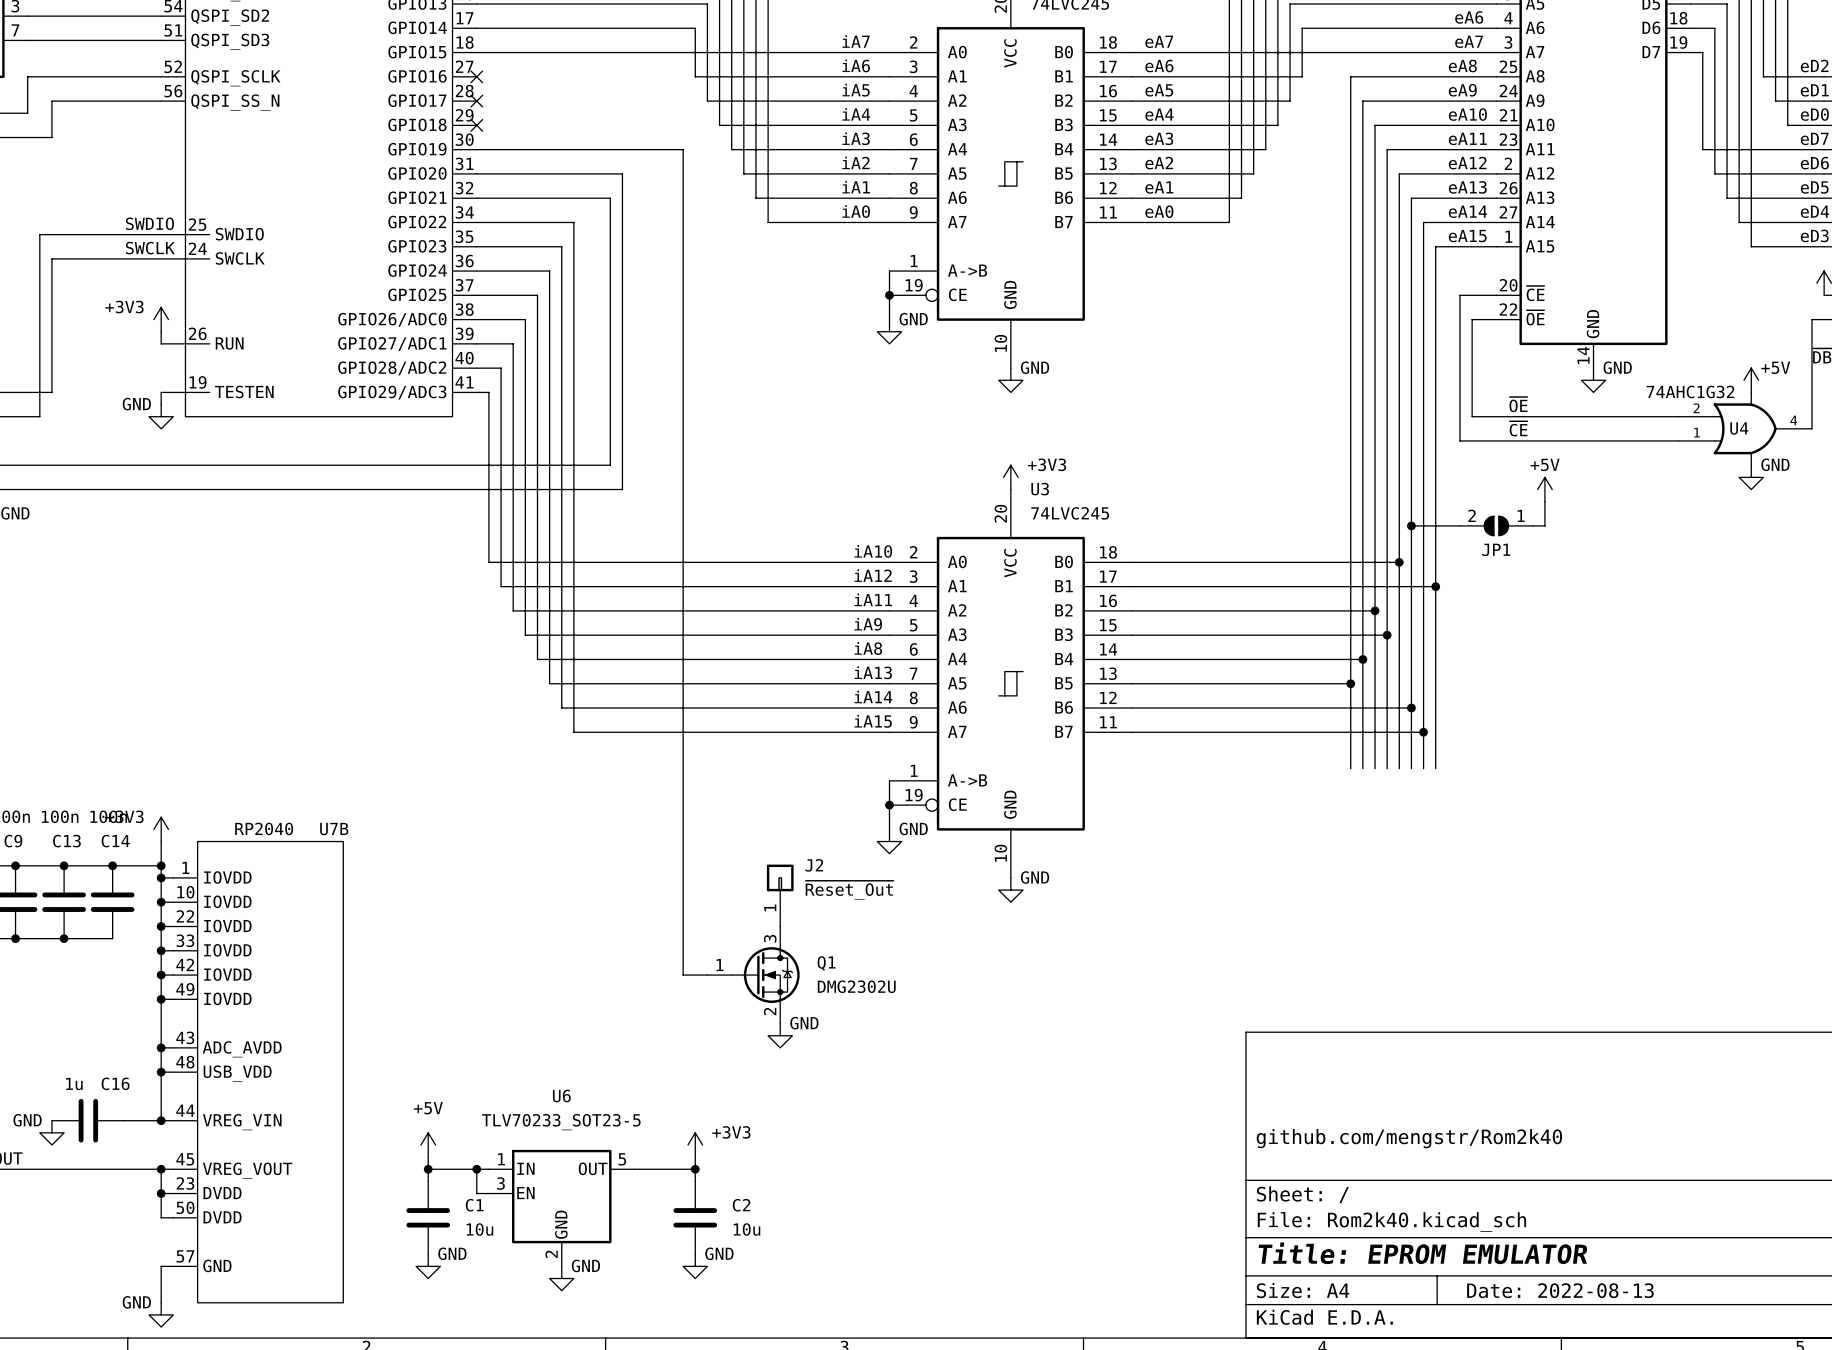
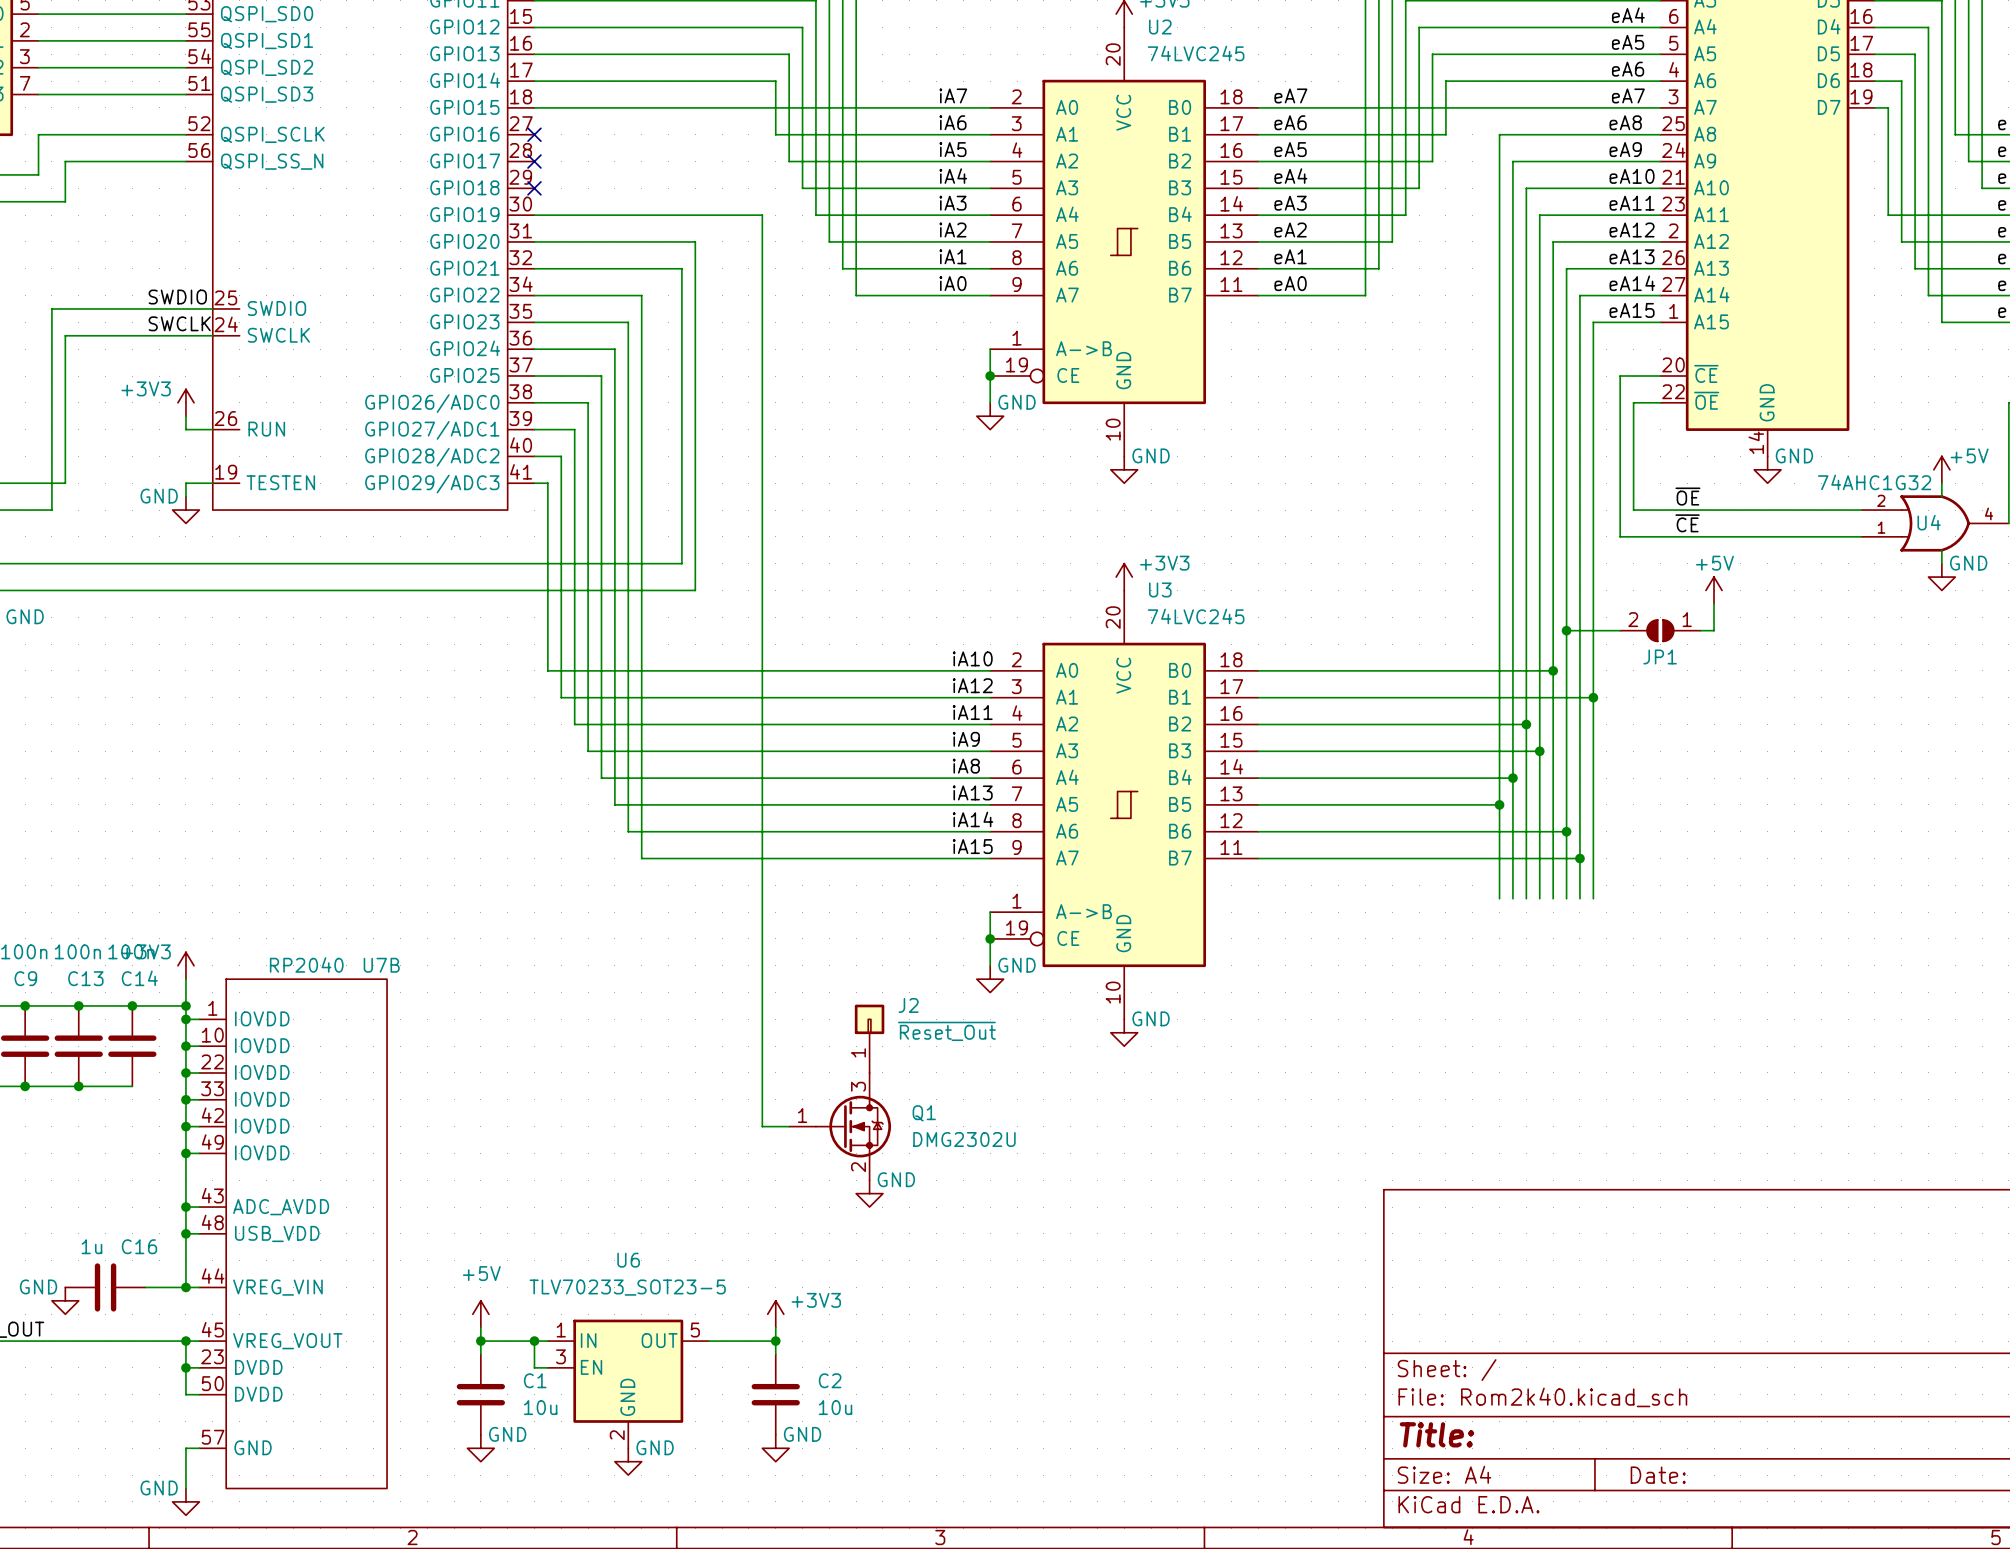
title block: github.com/mengstr/Rom2k40 (1409, 1138) -> none
title block: Title: EPROM EMULATOR (1423, 1253) -> Title: (1436, 1434)
title block: Date: 2022-08-13 (1560, 1290) -> Date: (1658, 1475)

